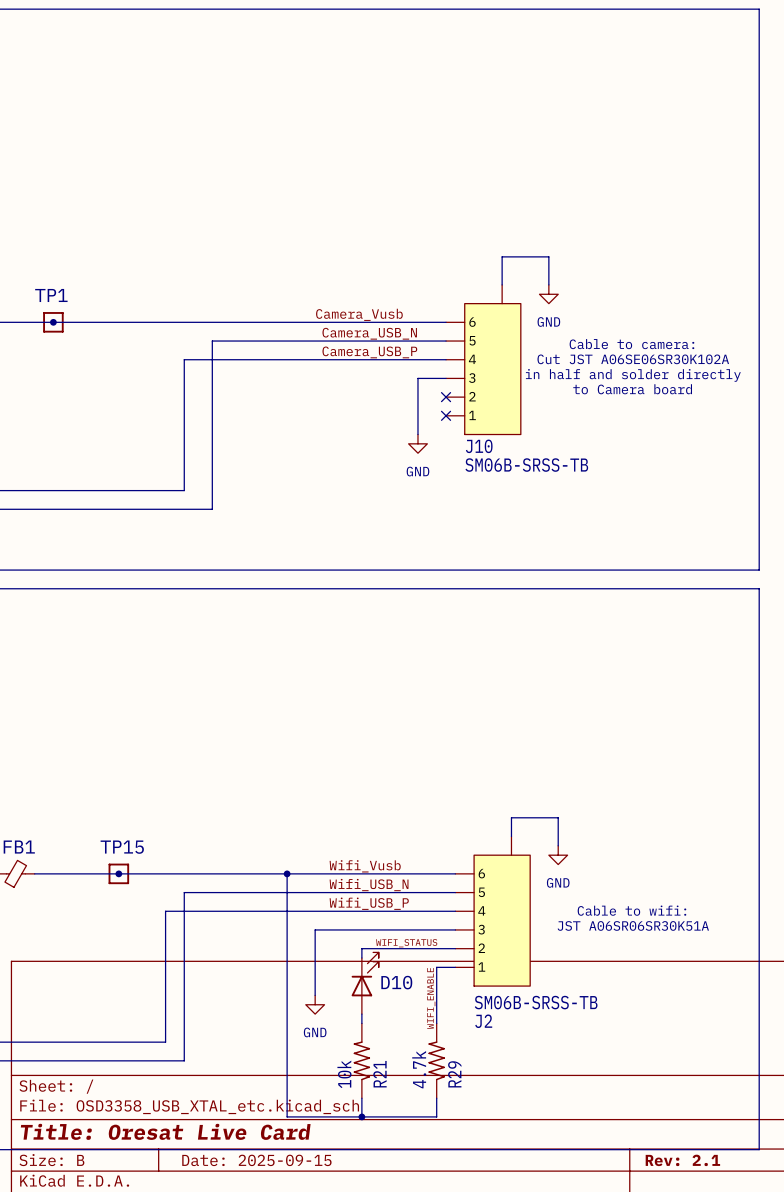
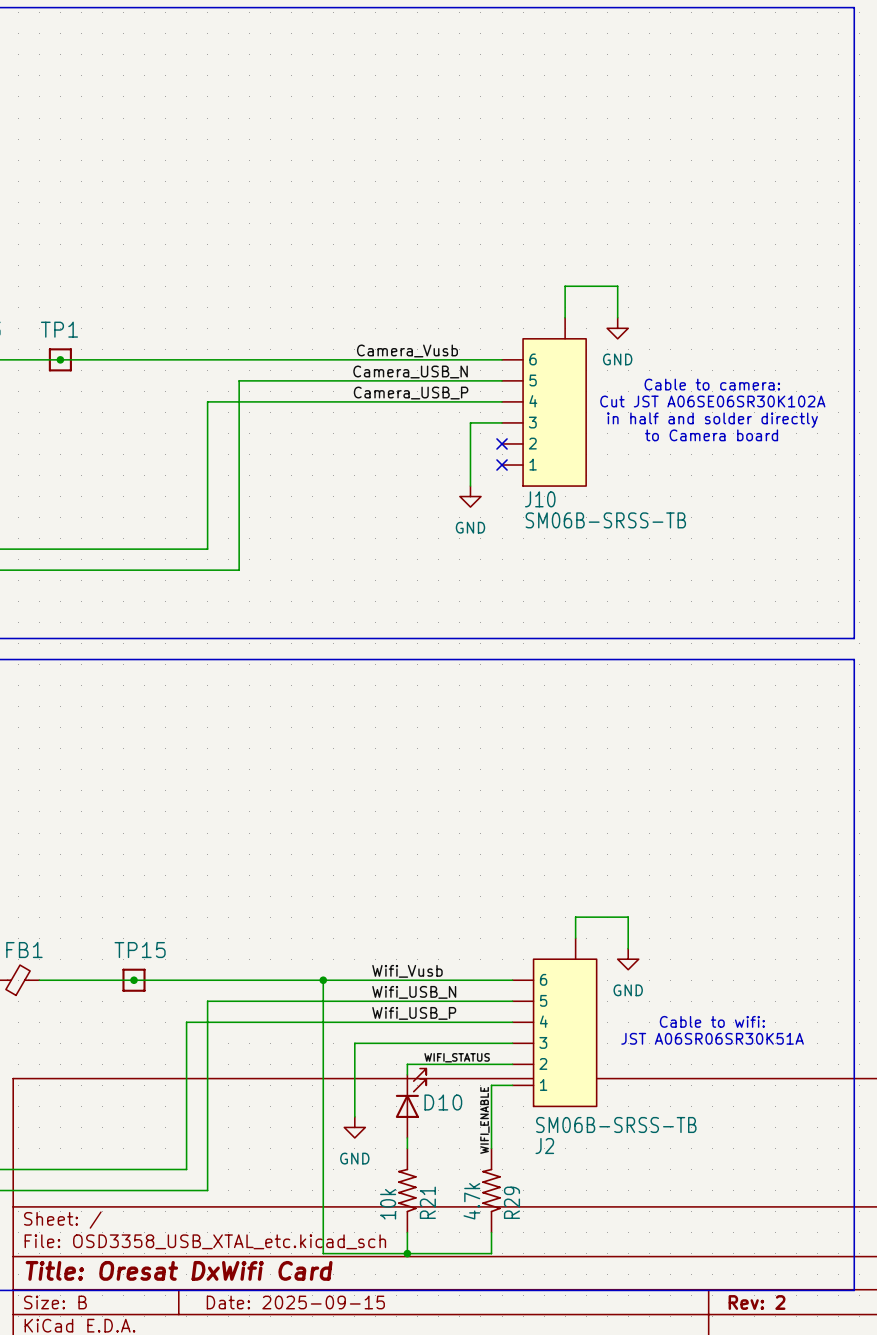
title block: Title: Oresat Live Card (165, 1131) -> Title: Oresat DxWifi Card (179, 1270)
title block: Rev: 2.1 (682, 1160) -> Rev: 2 (757, 1302)

